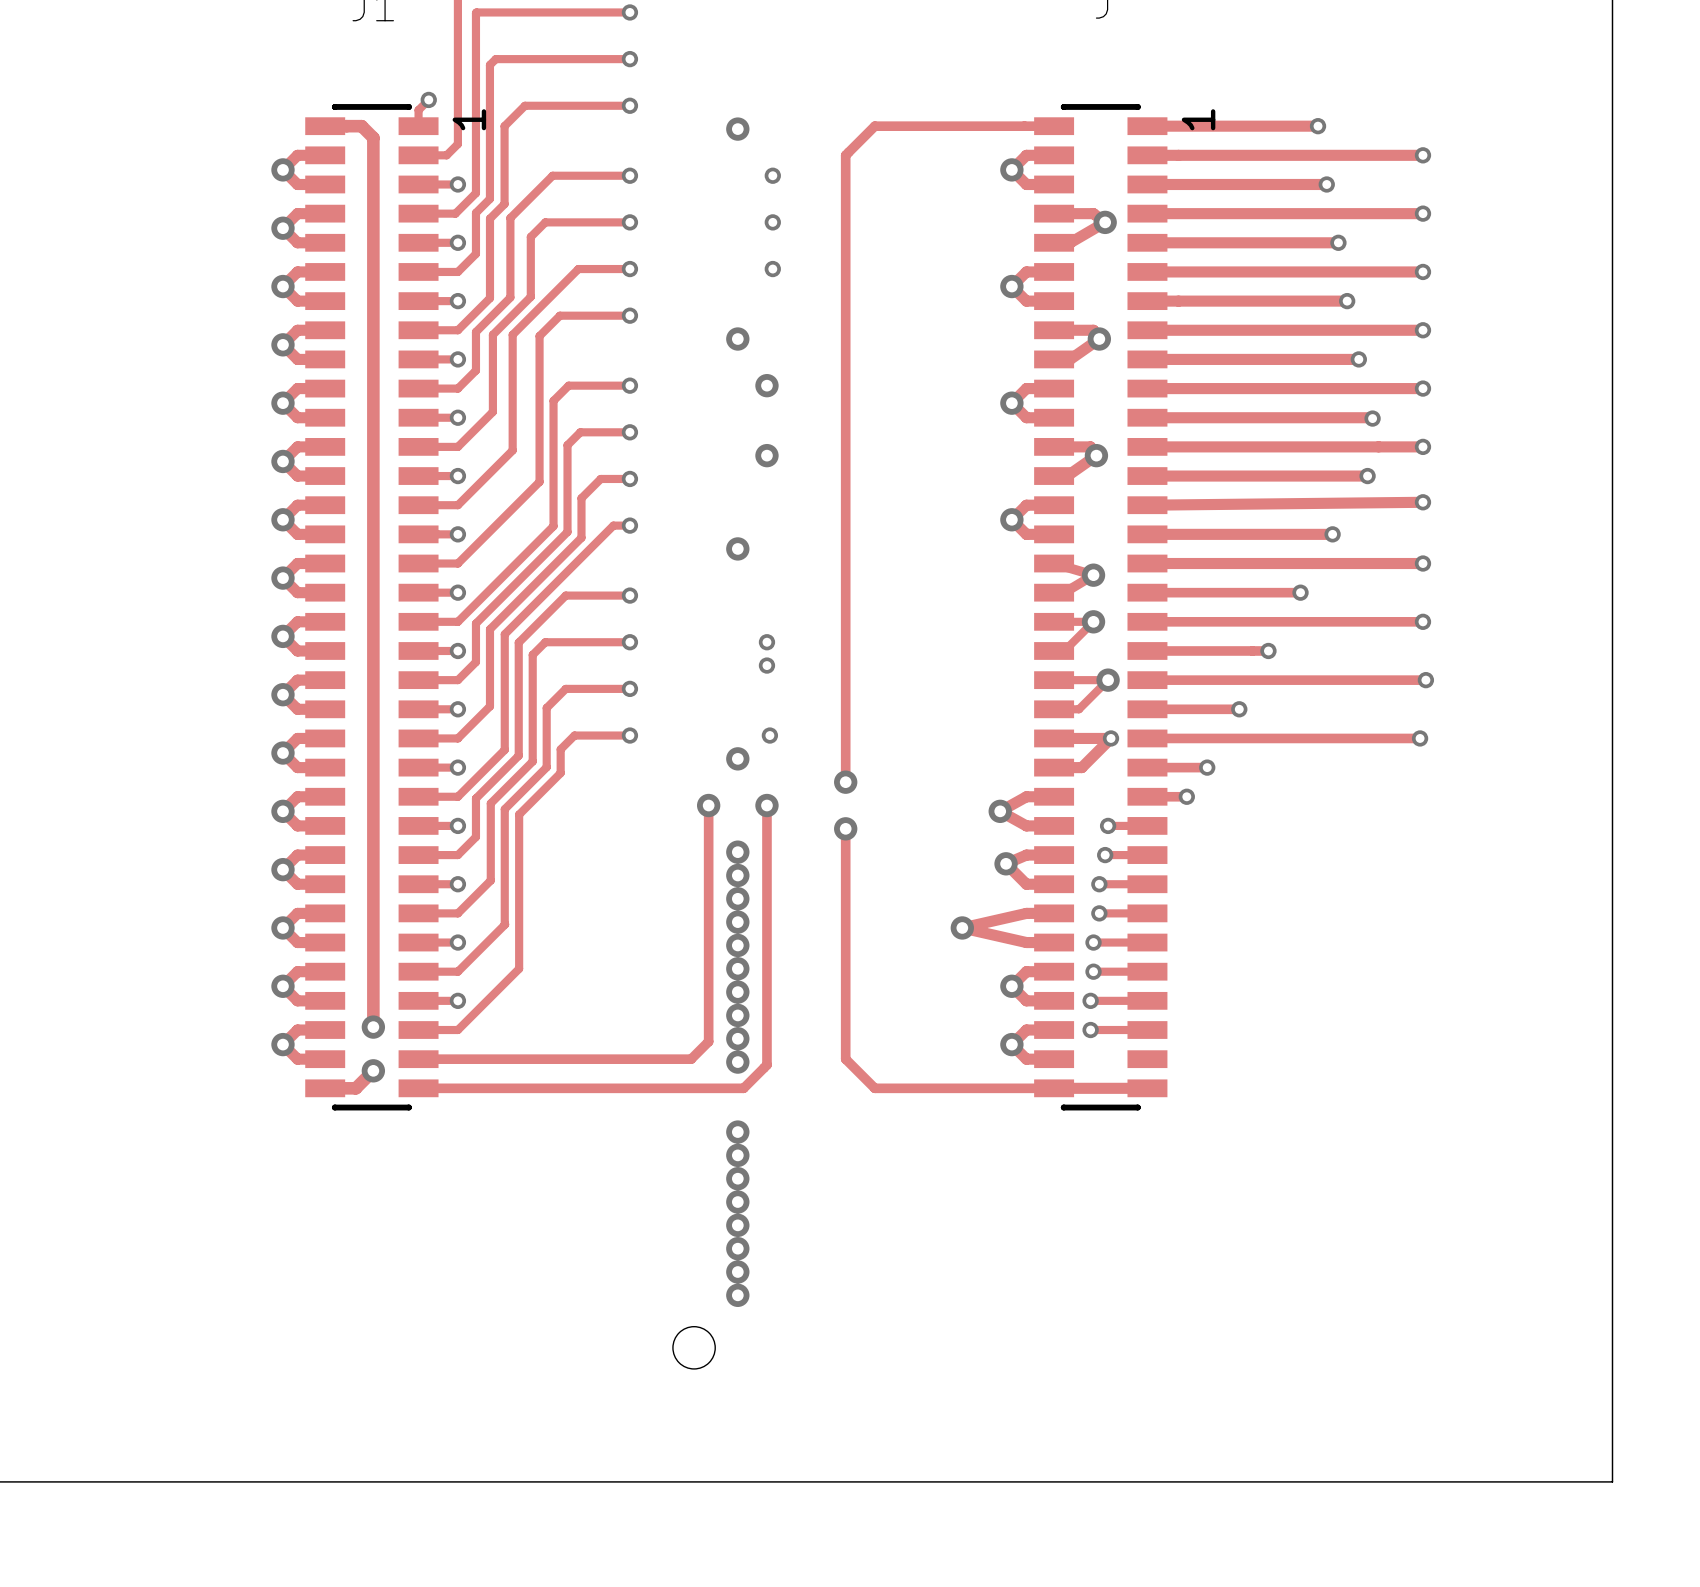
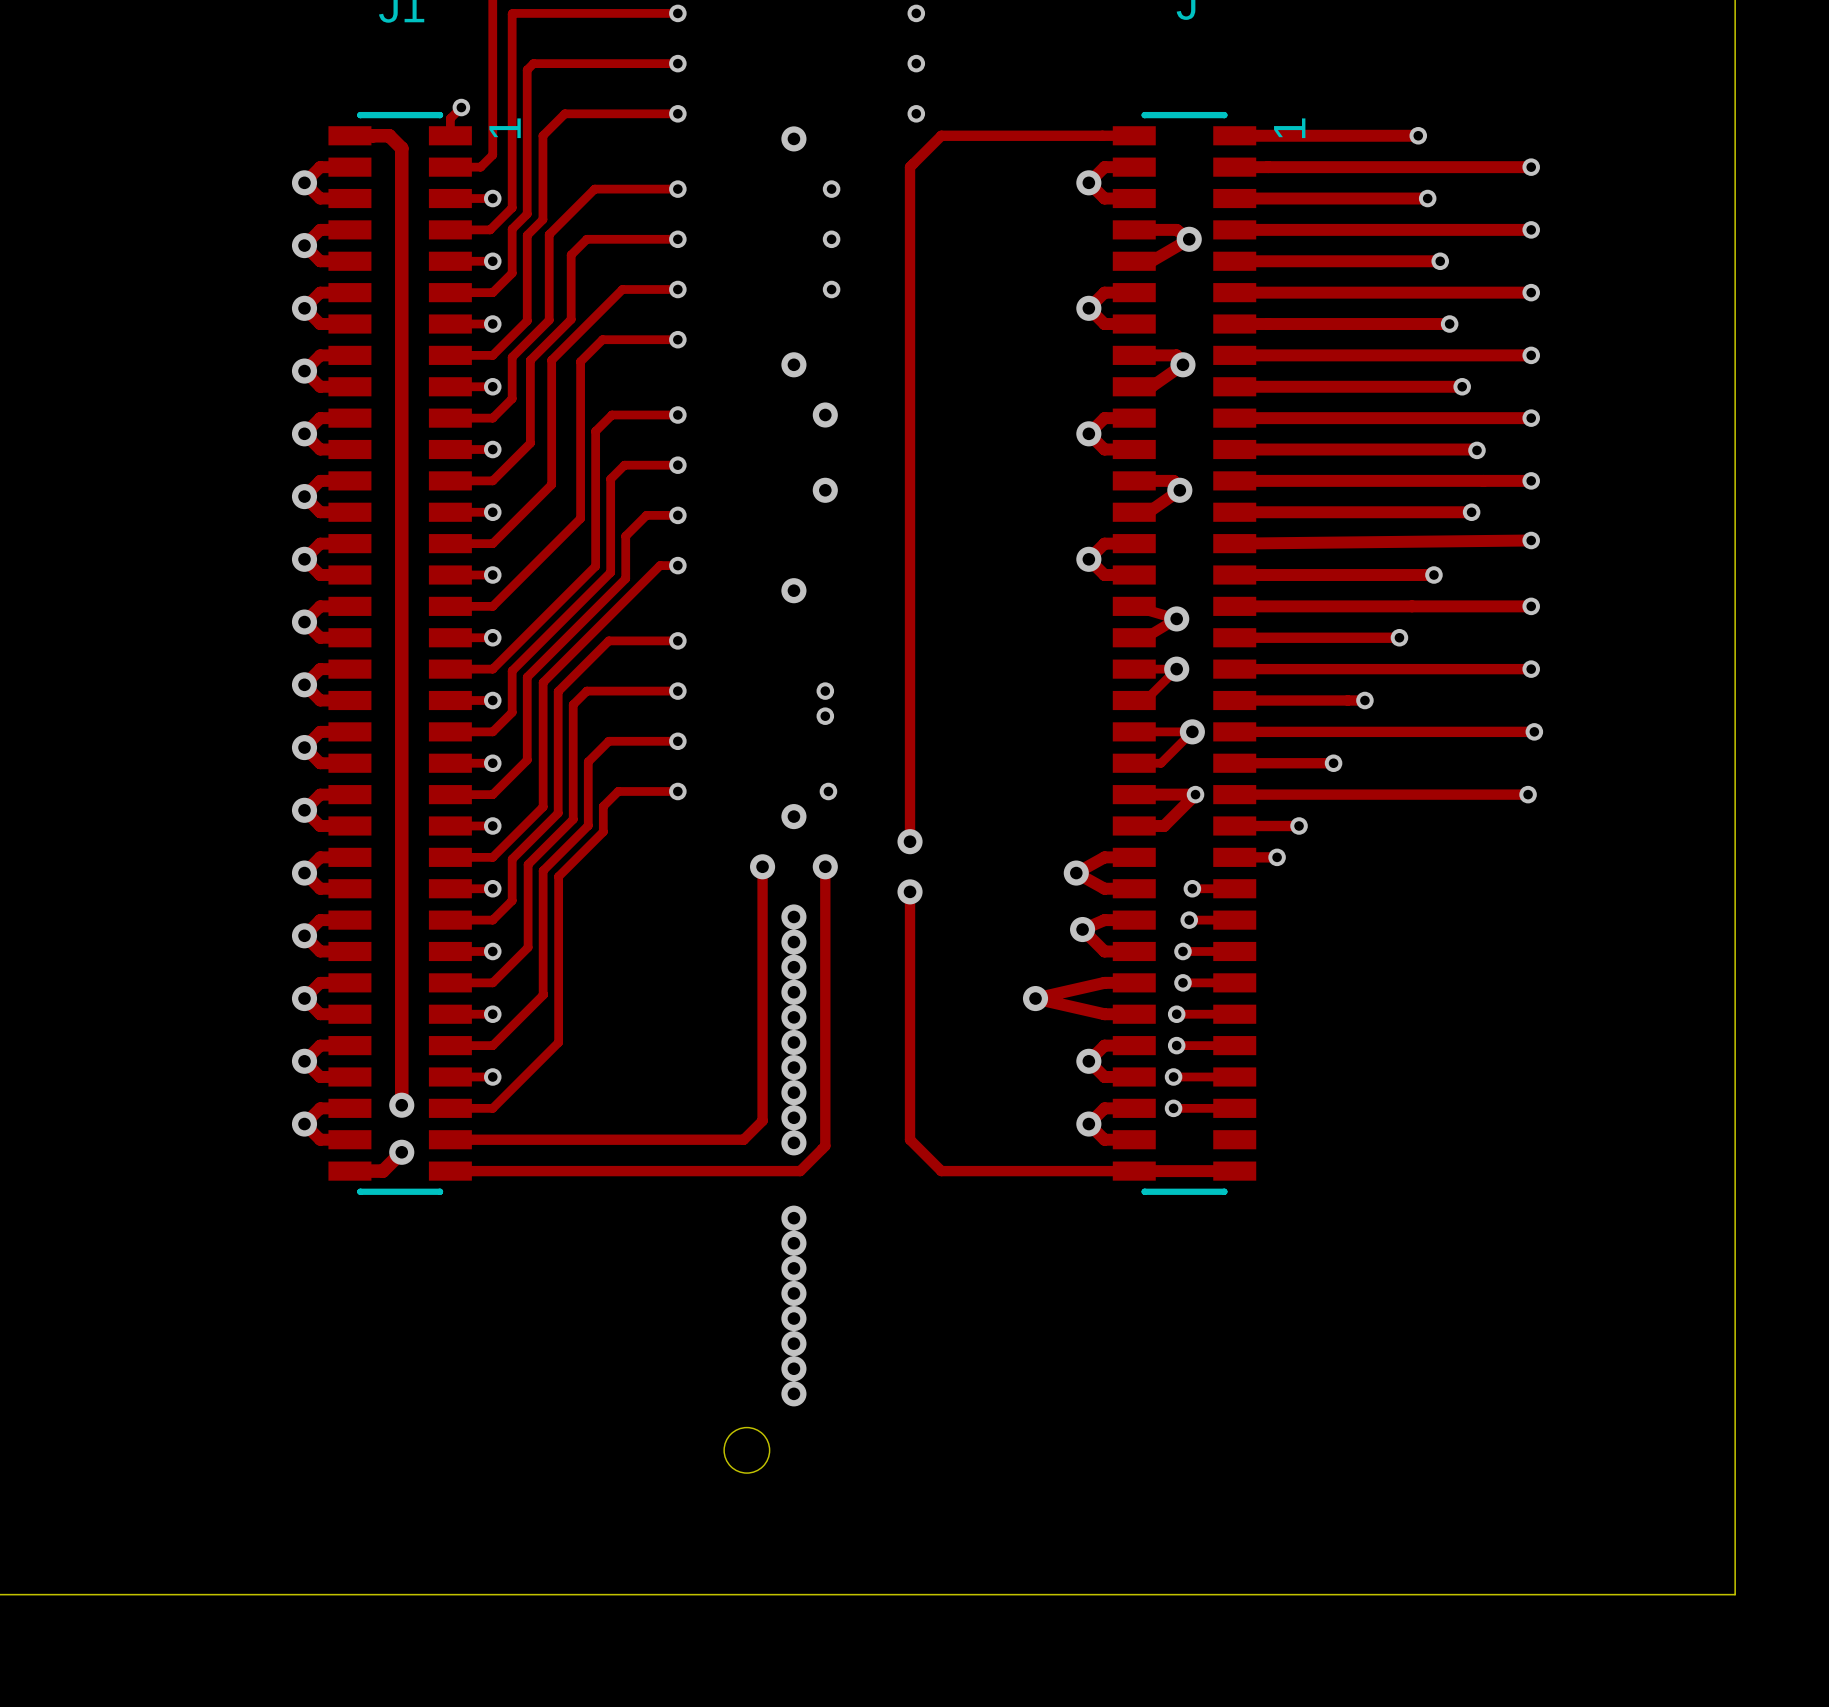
via: none -> (916, 13)
via: none -> (916, 63)
via: none -> (916, 113)

